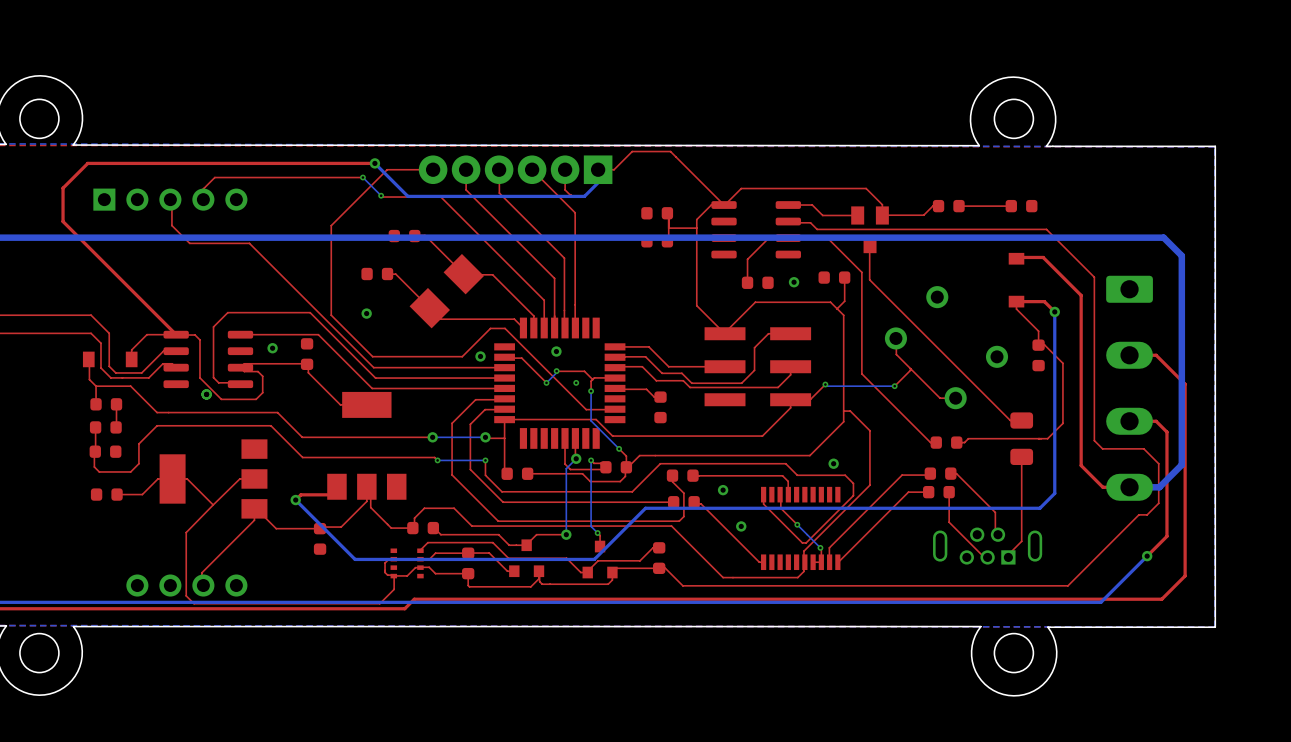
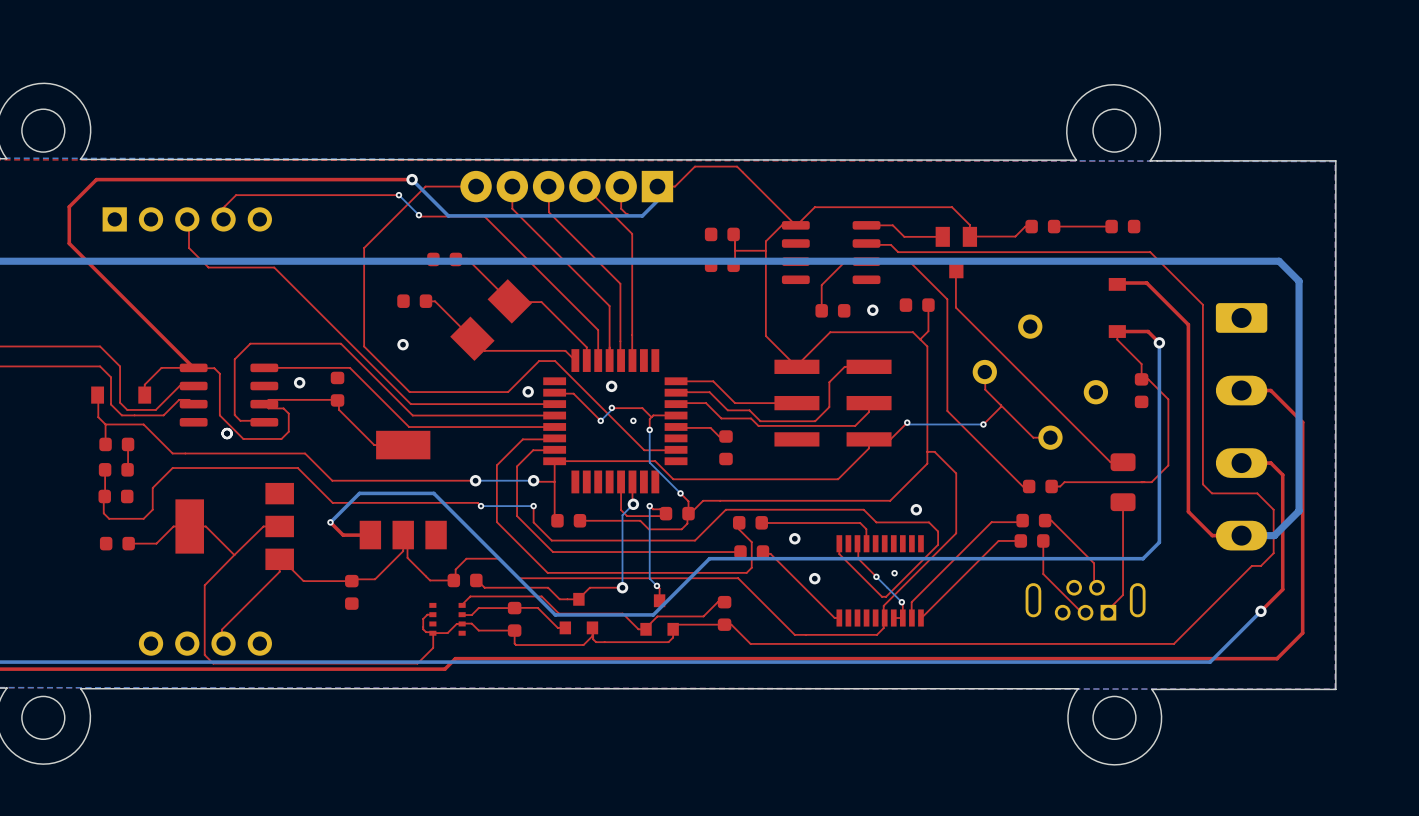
top track: none -> (330, 522) (343, 535) (370, 535)
via: none -> (330, 522)
top track: (327, 494) (300, 494) (295, 500) -> none
bottom track: (295, 500) (355, 559) (505, 559) -> (330, 522) (359, 493) (433, 493) (555, 614)
via: (295, 500) -> none
via: none -> (894, 573)

